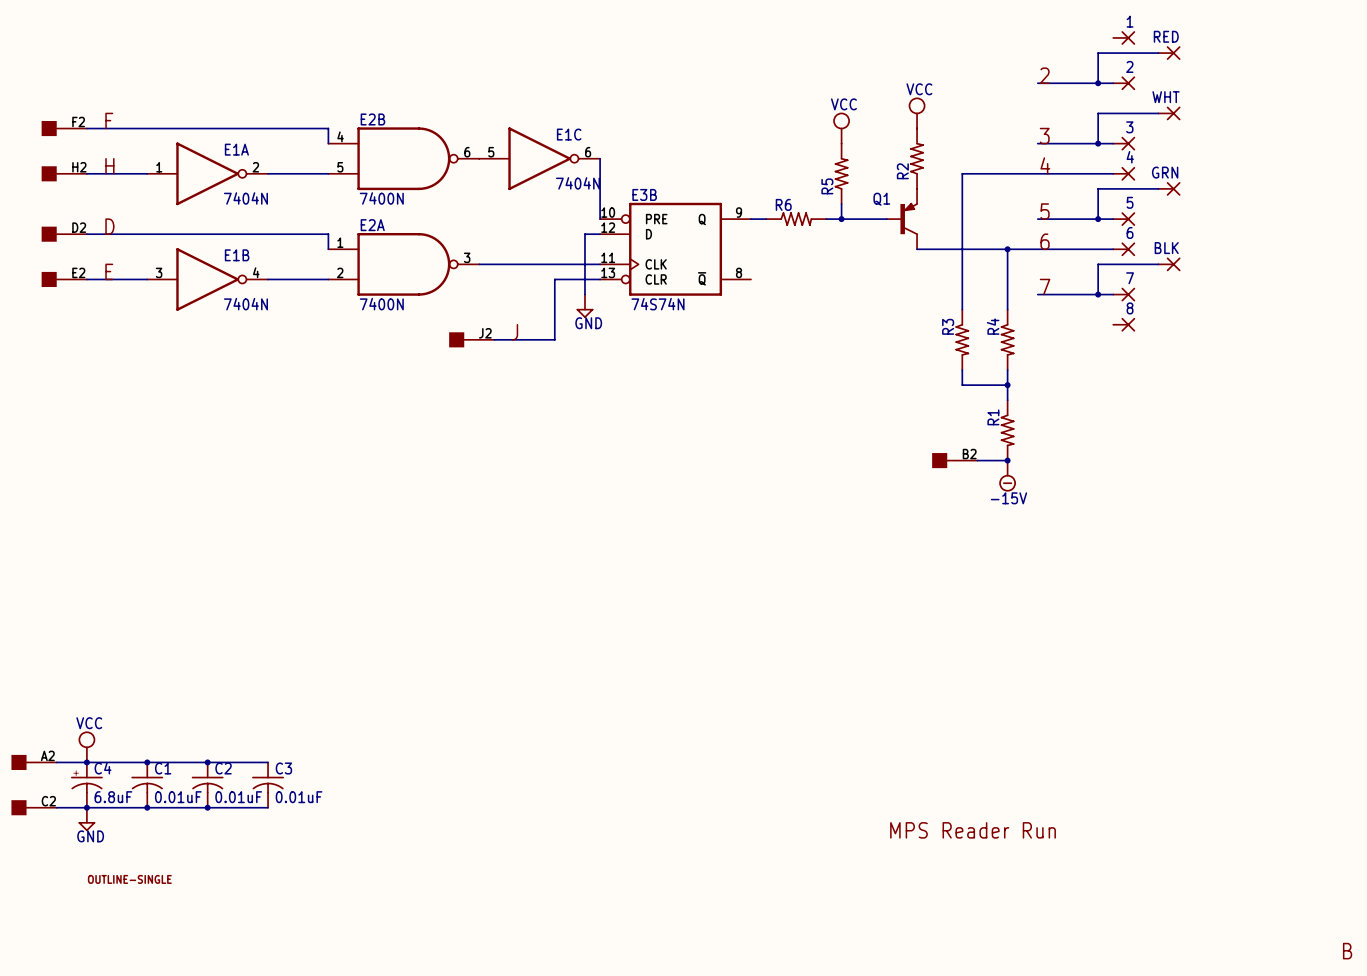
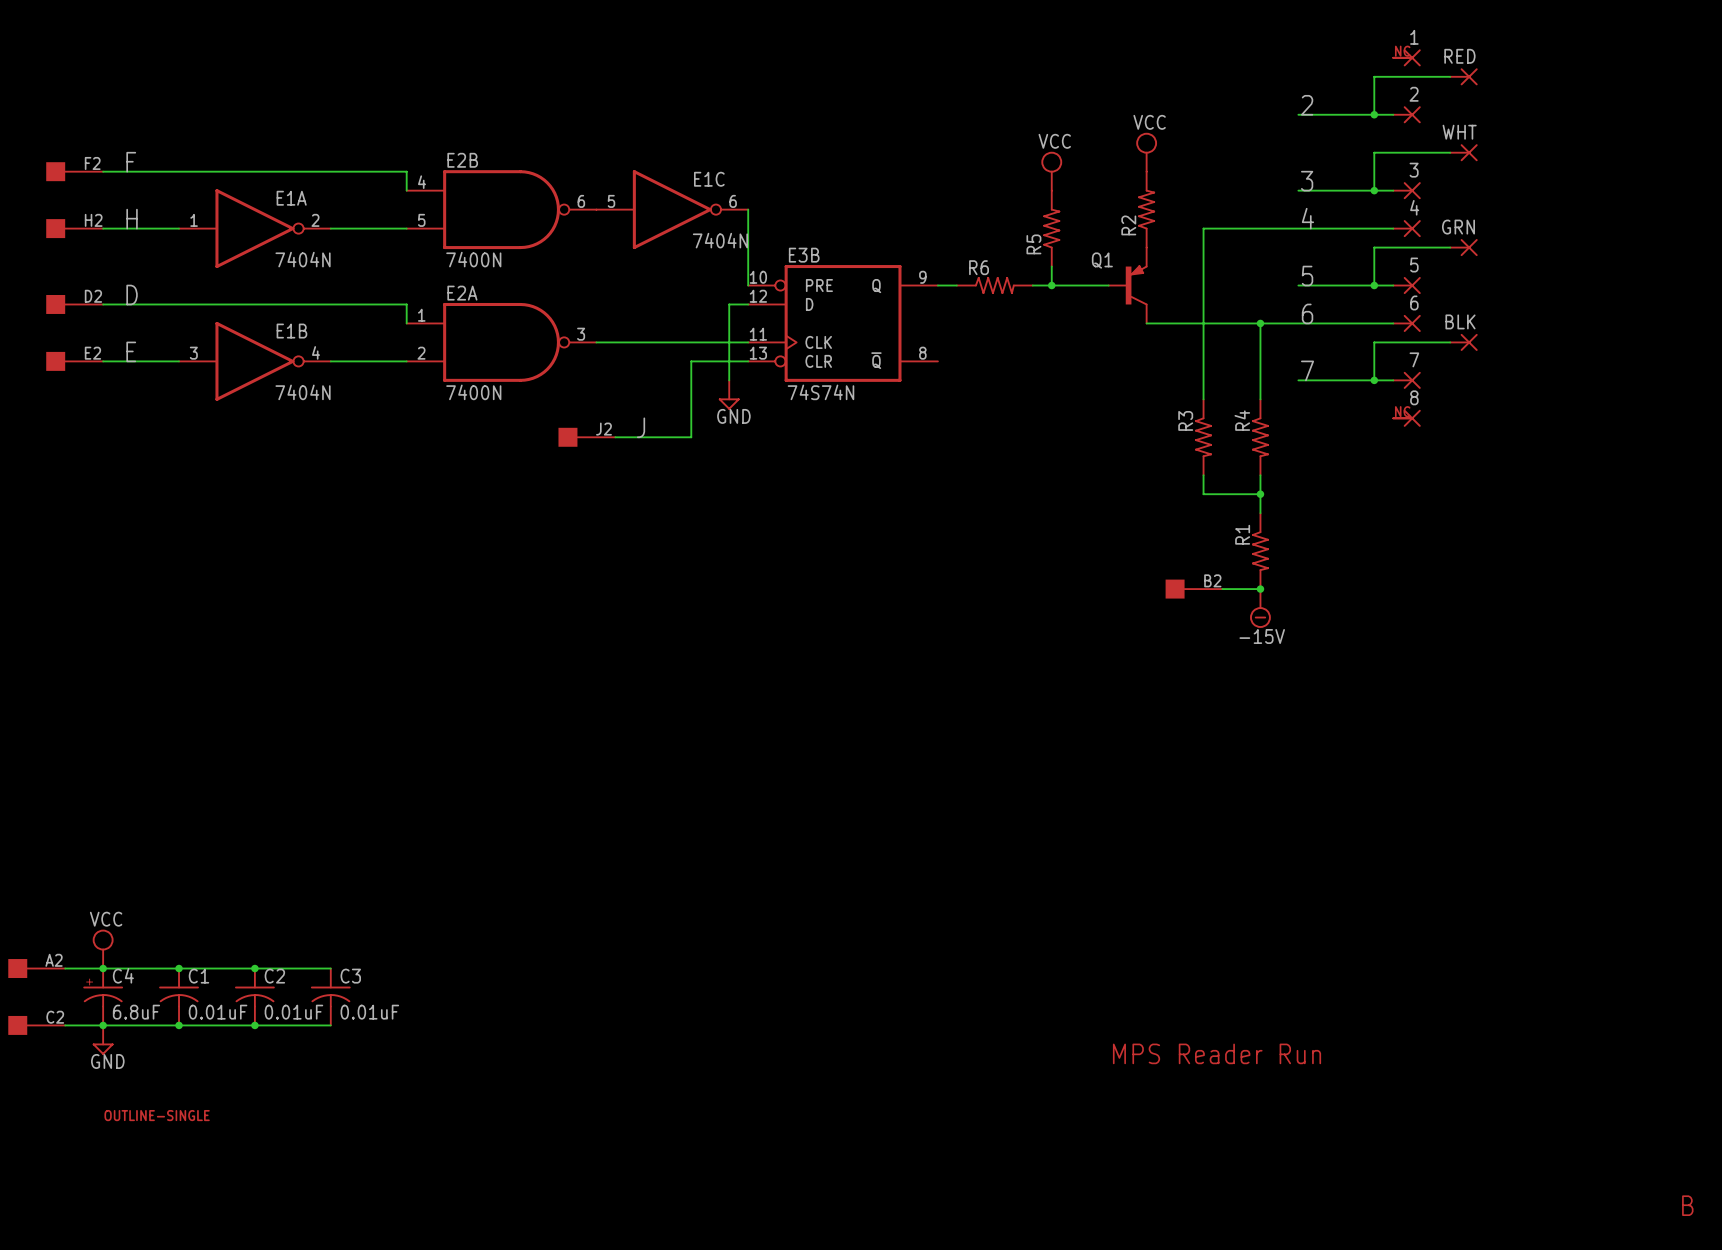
power symbol: none -> (1402, 57)
power symbol: none -> (1402, 418)

